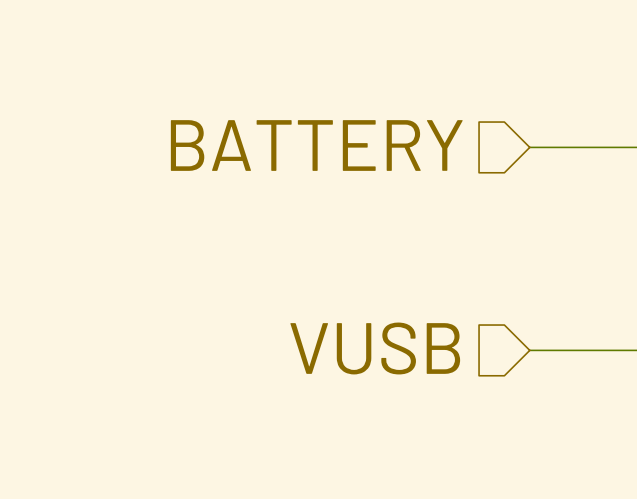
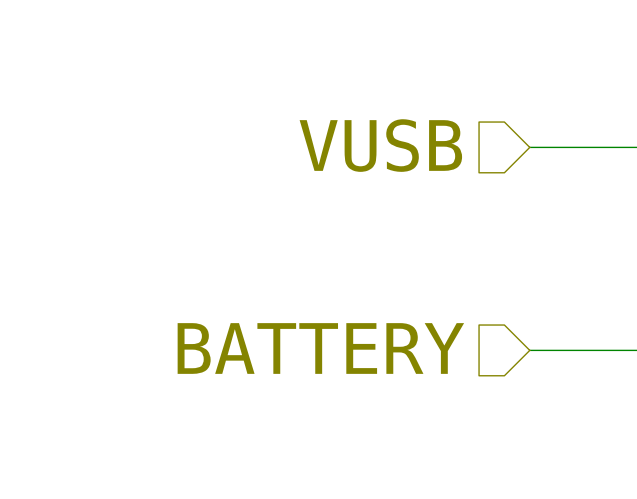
hierarchical label: BATTERY (316, 145) -> VUSB (380, 145)
hierarchical label: VUSB (375, 348) -> BATTERY (320, 348)

